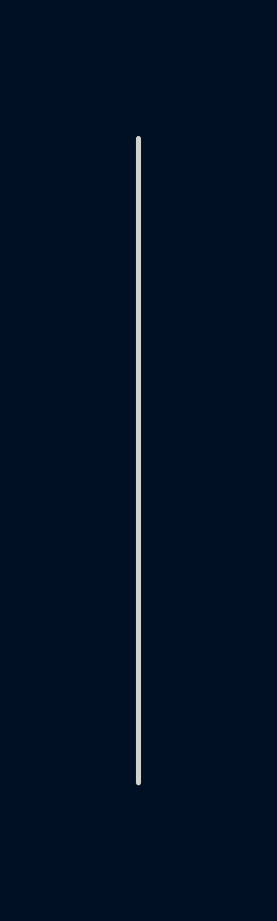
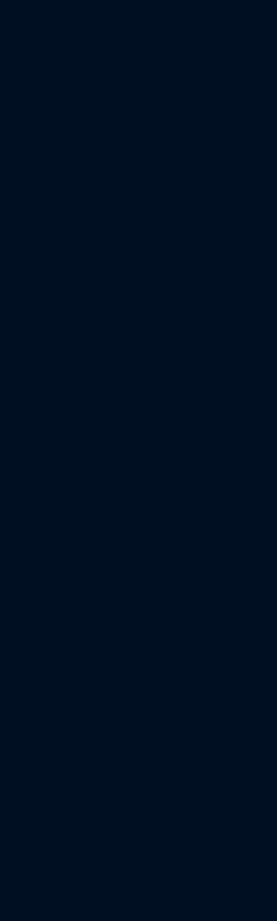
board edge: (138, 138) (138, 782) -> none

